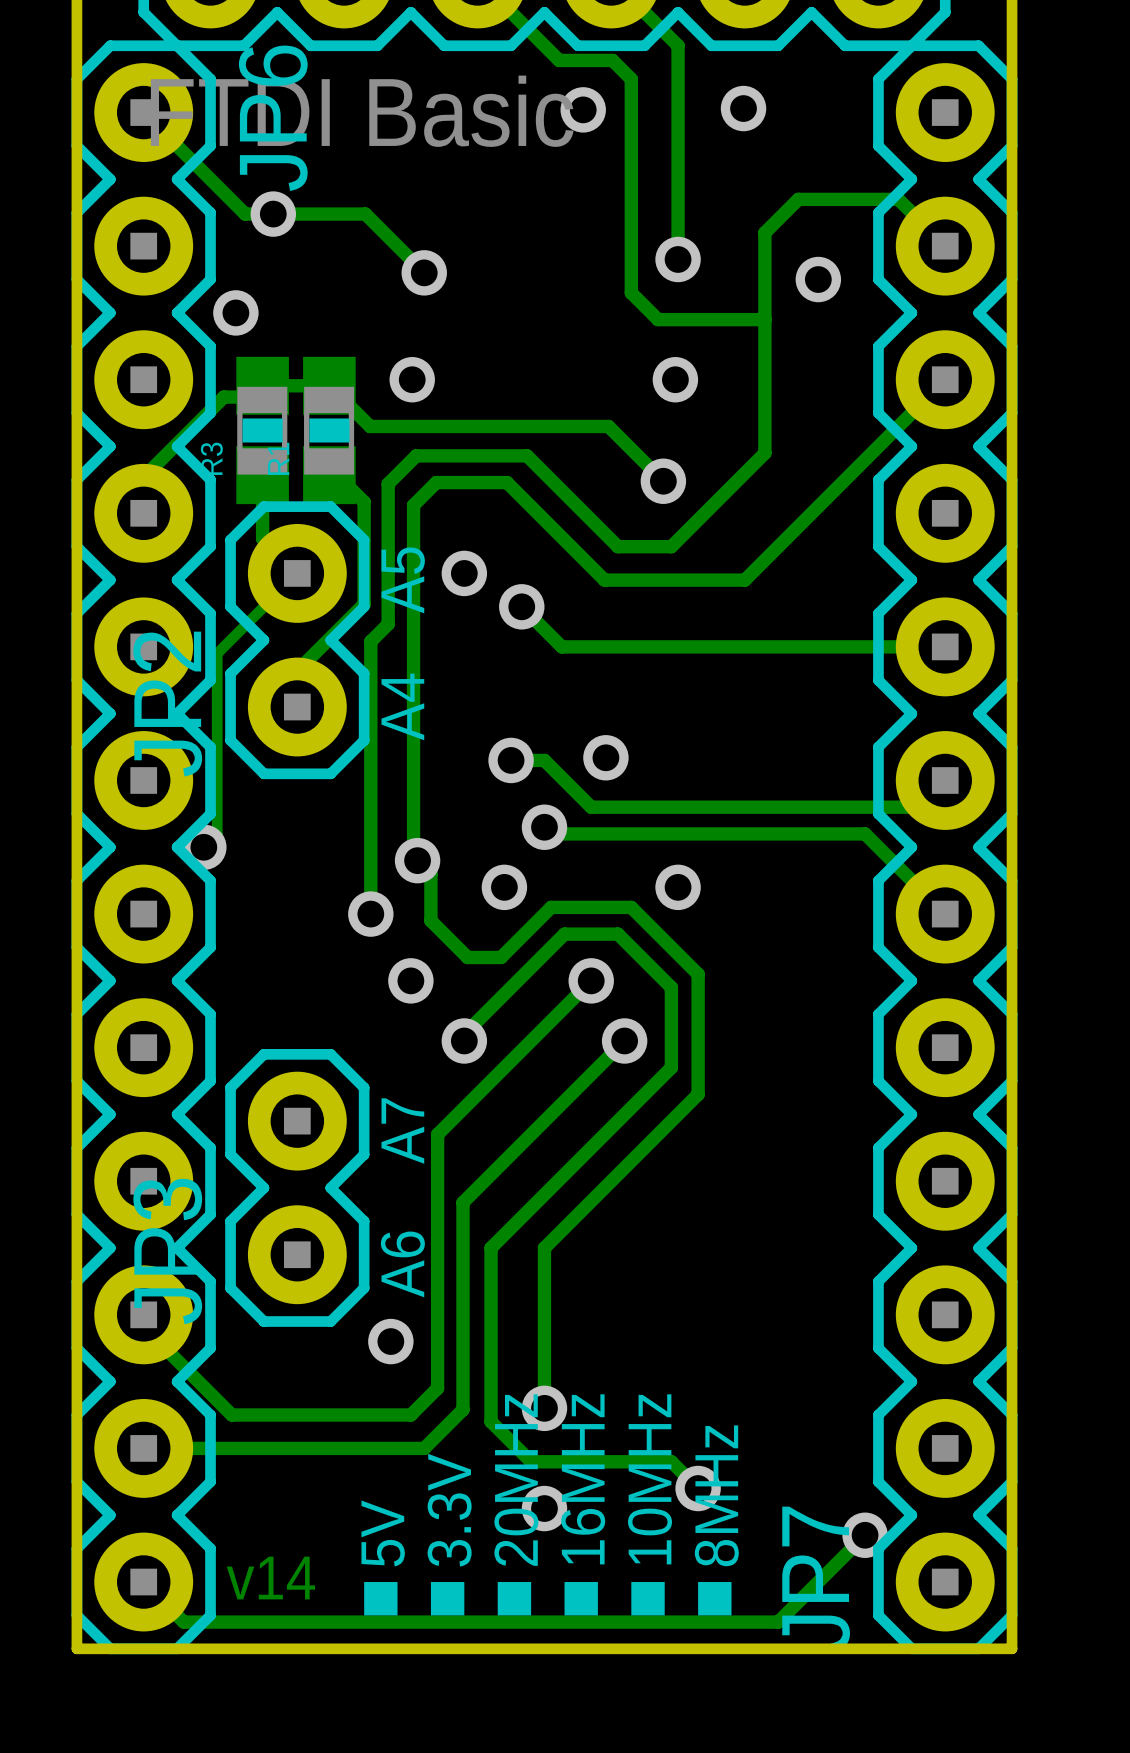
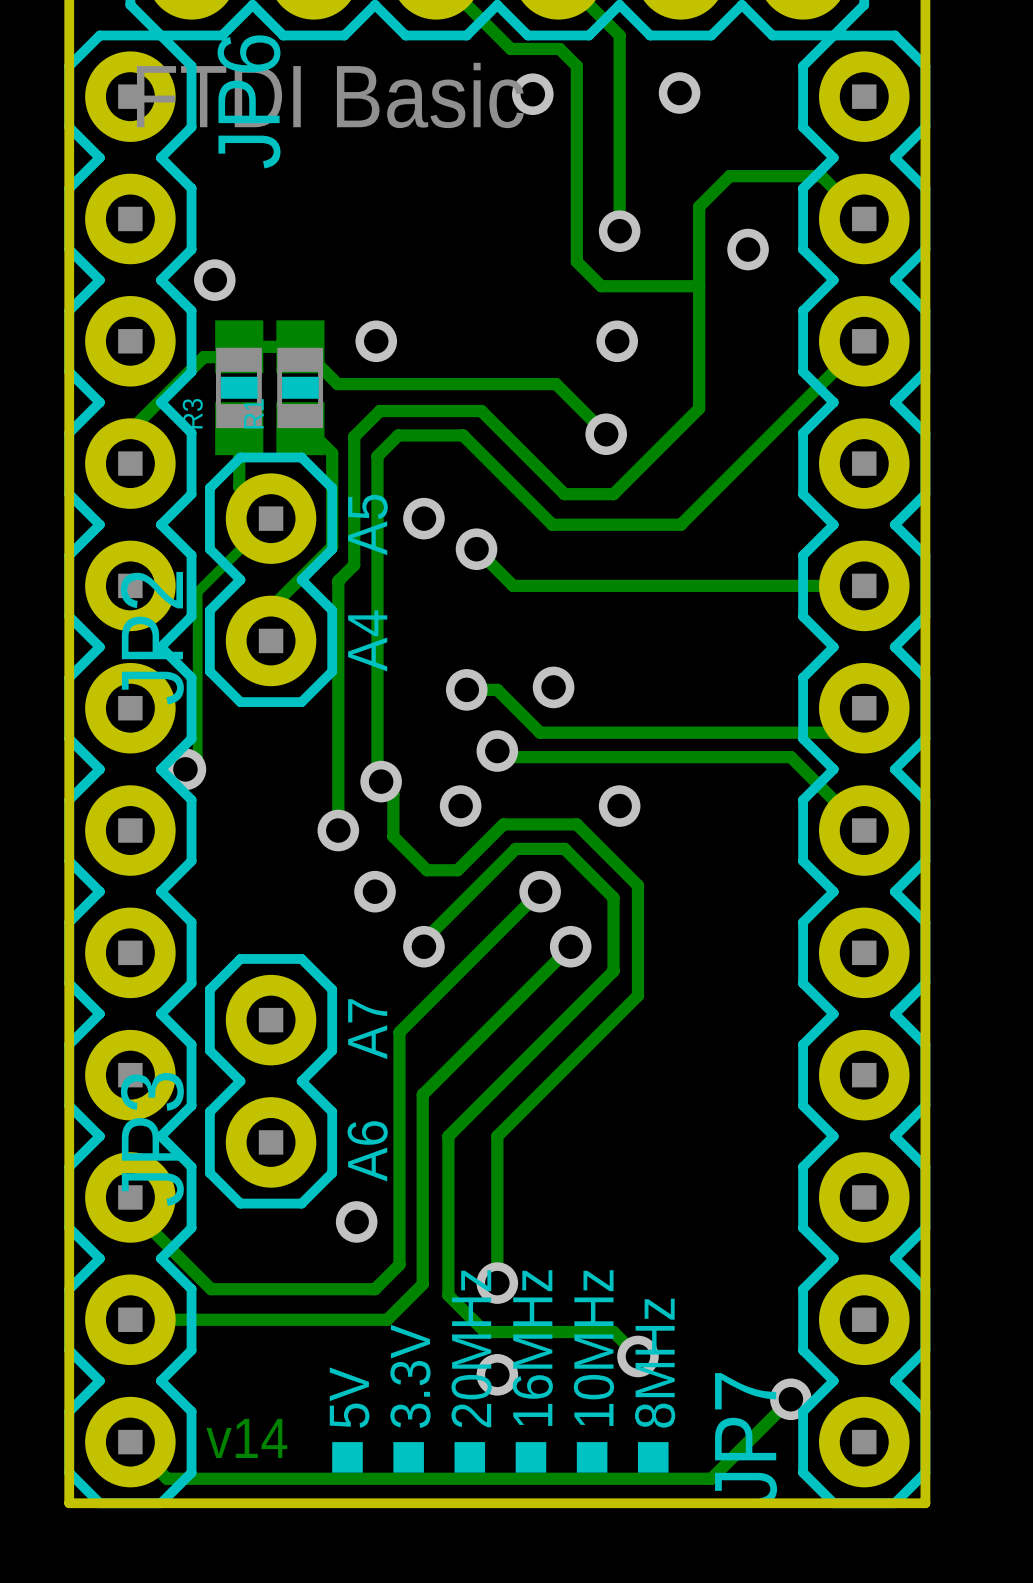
track: (143, 112) (245, 214) (365, 214) (424, 272) -> none
via: (273, 214) -> none
via: (424, 272) -> none

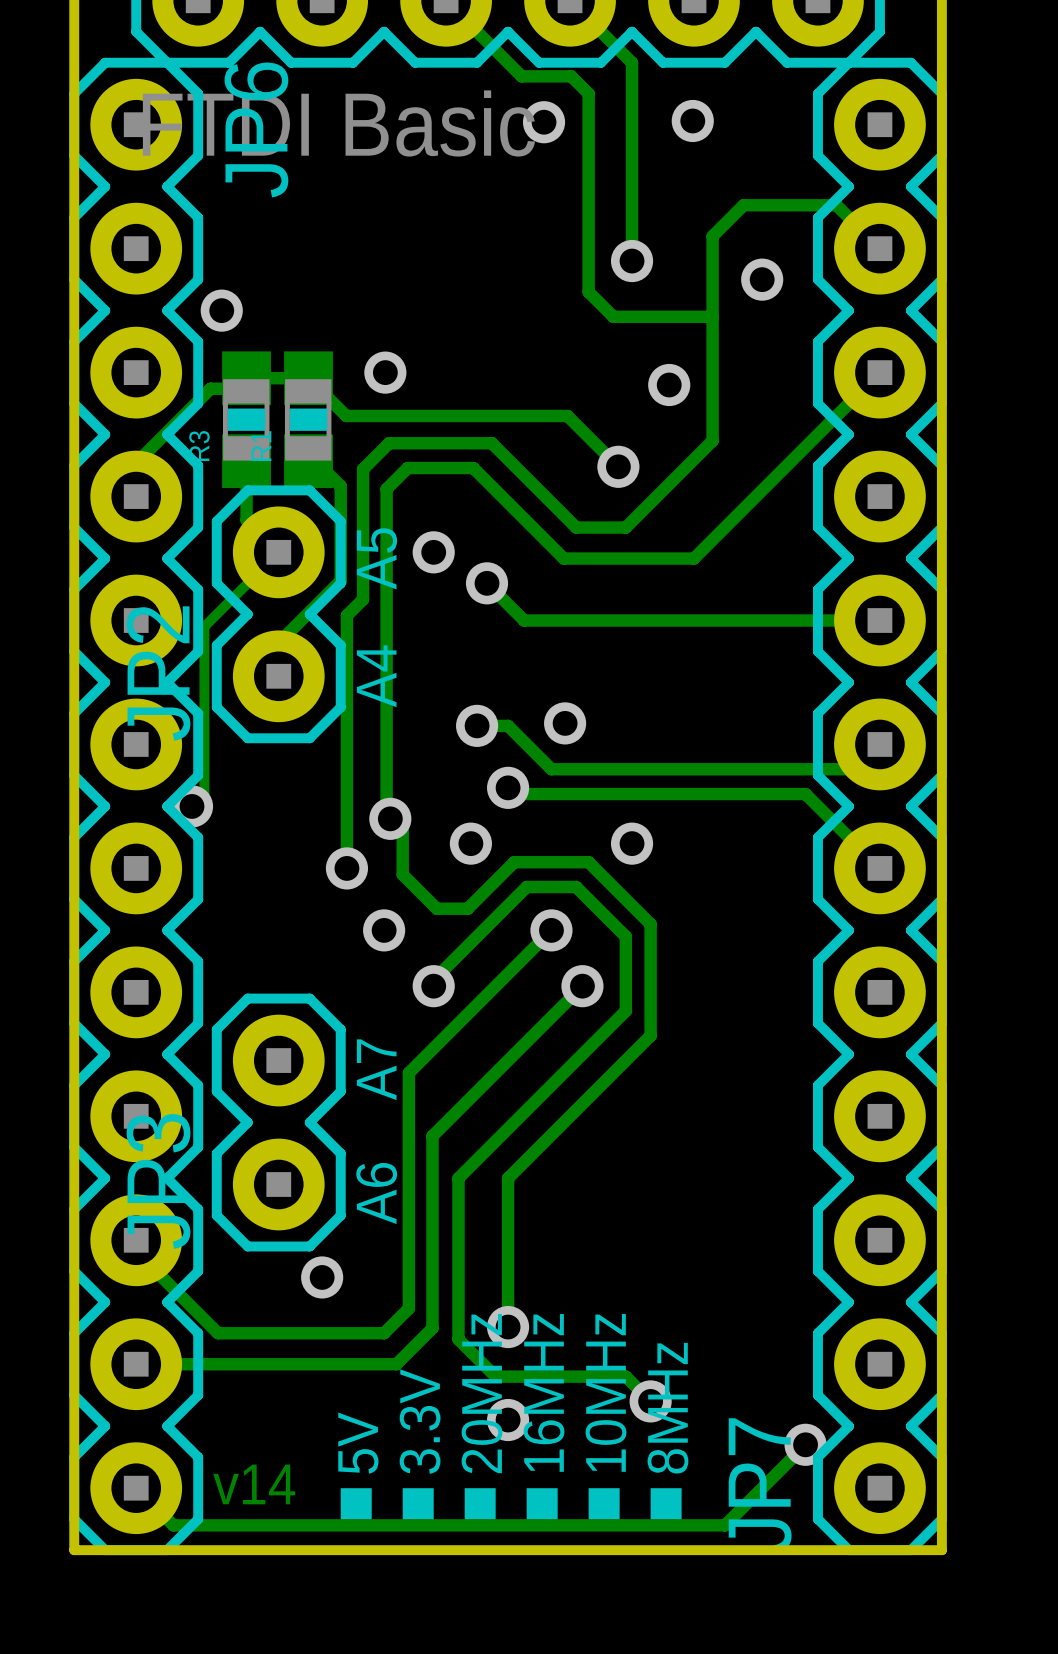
via position: (617, 341) -> (669, 385)
via position: (356, 1221) -> (322, 1277)

